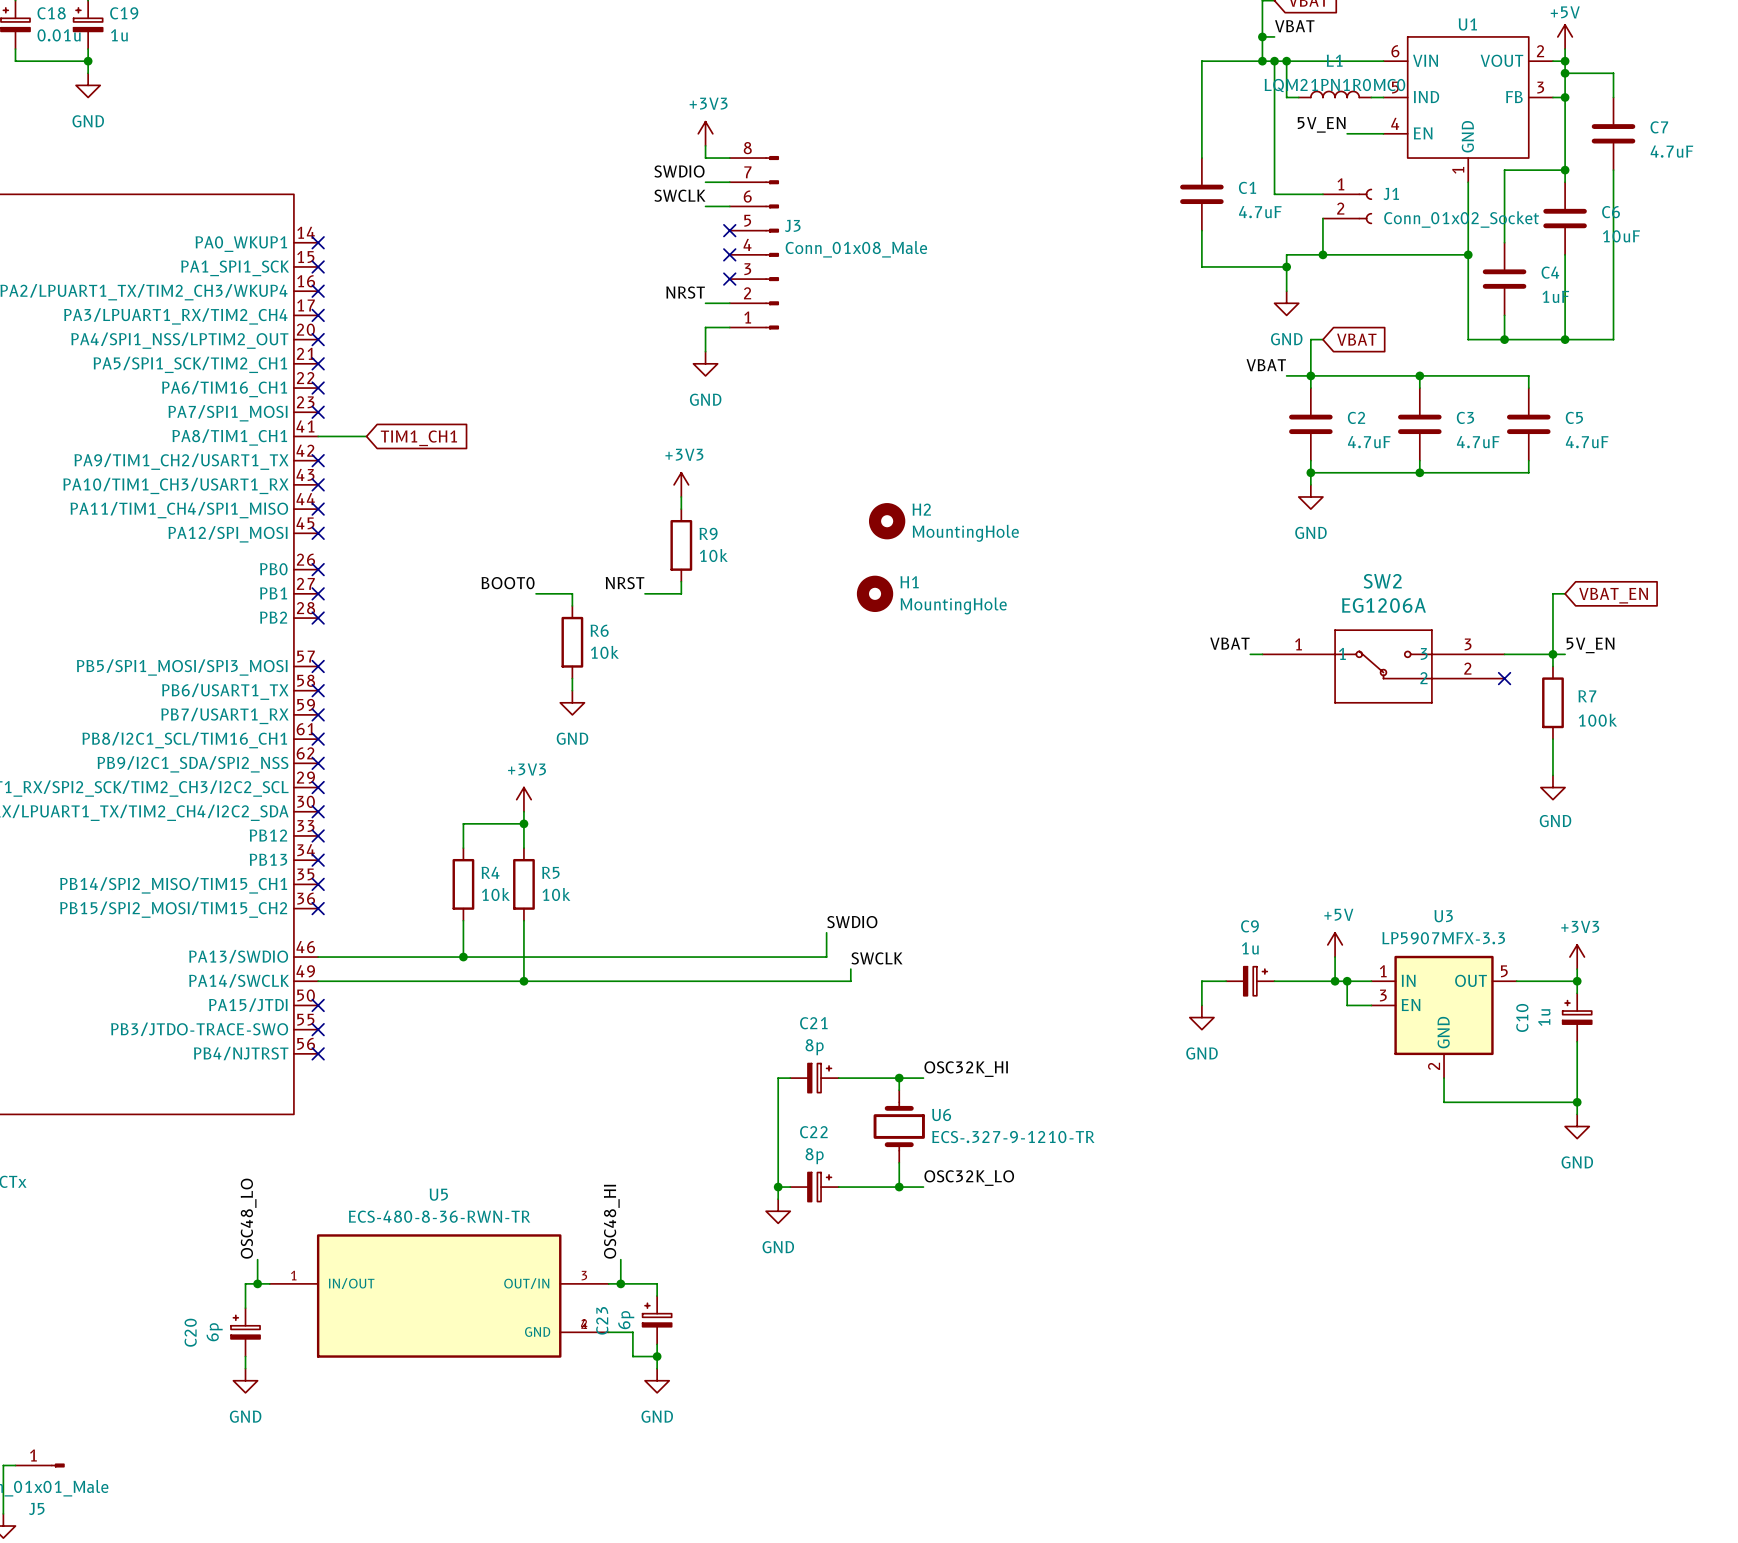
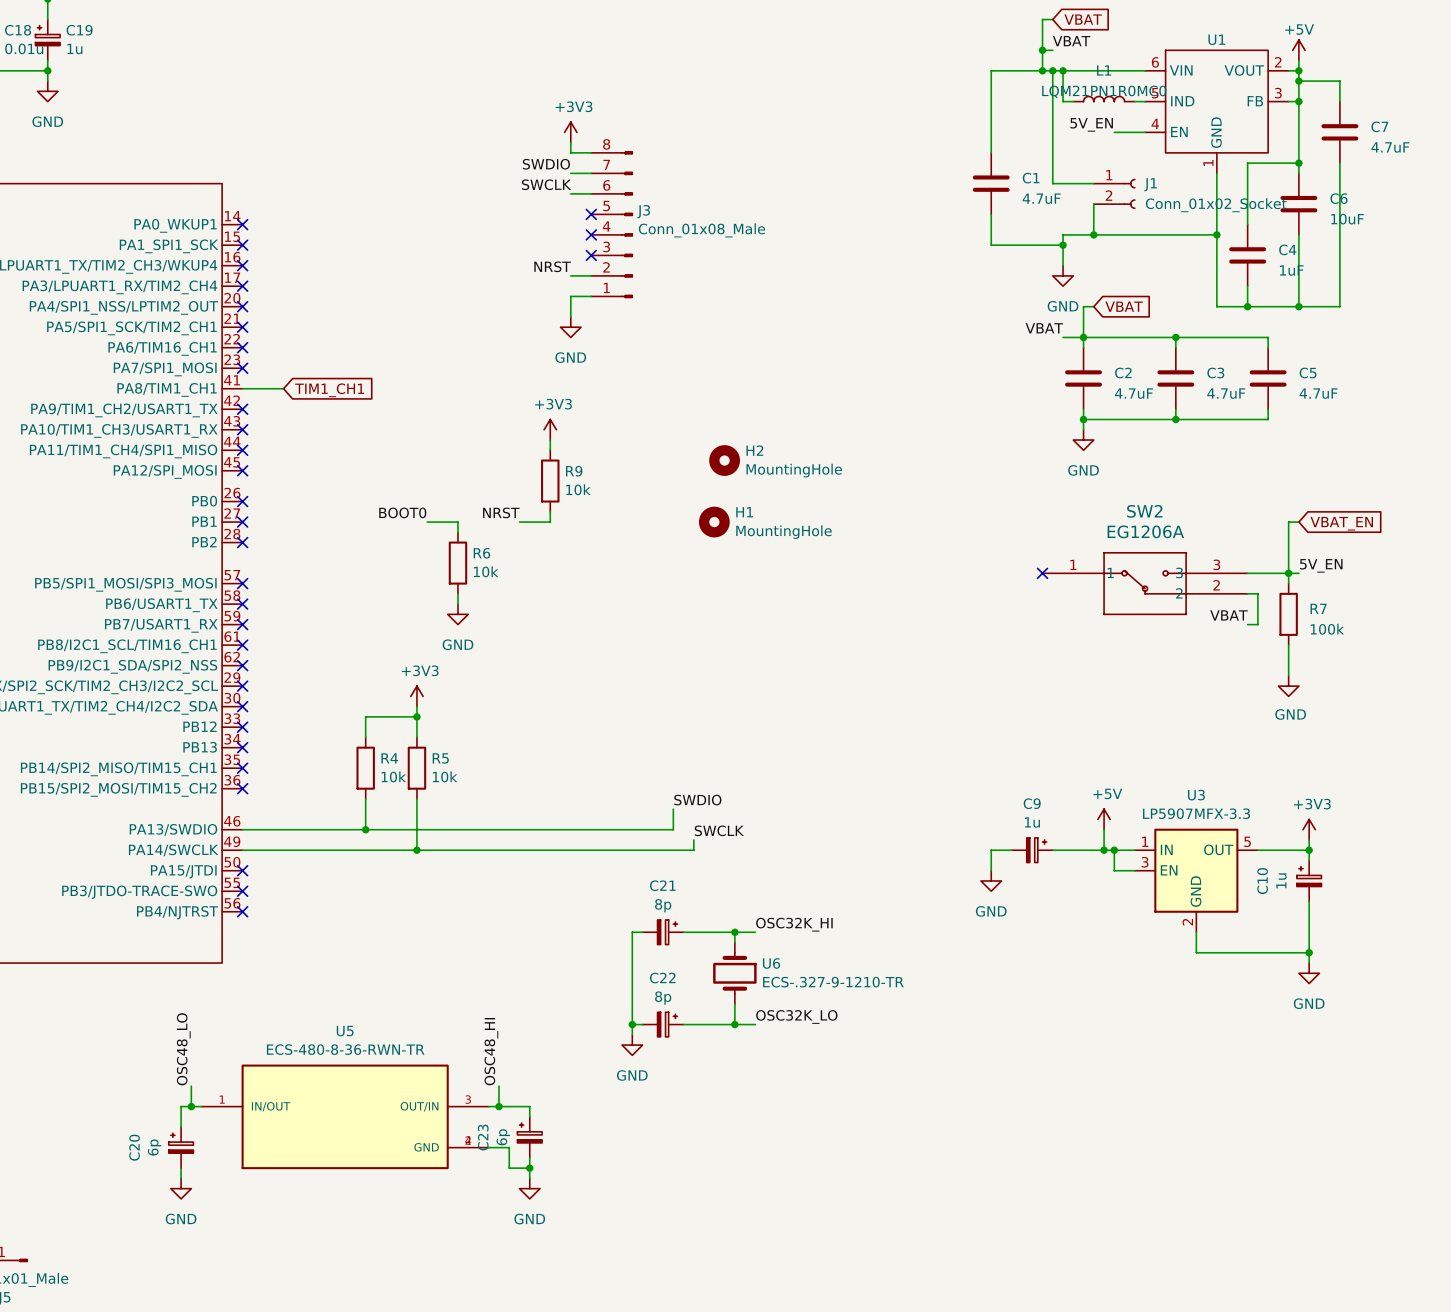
label: VBAT (1229, 643) -> none
wire: (1250, 654) (1262, 654) -> none
no-connect mark: none -> (1042, 573)
wire: none -> (1247, 593) (1257, 593) (1257, 624) (1247, 624)
no-connect mark: (1504, 678) -> none
label: none -> VBAT (1228, 615)

